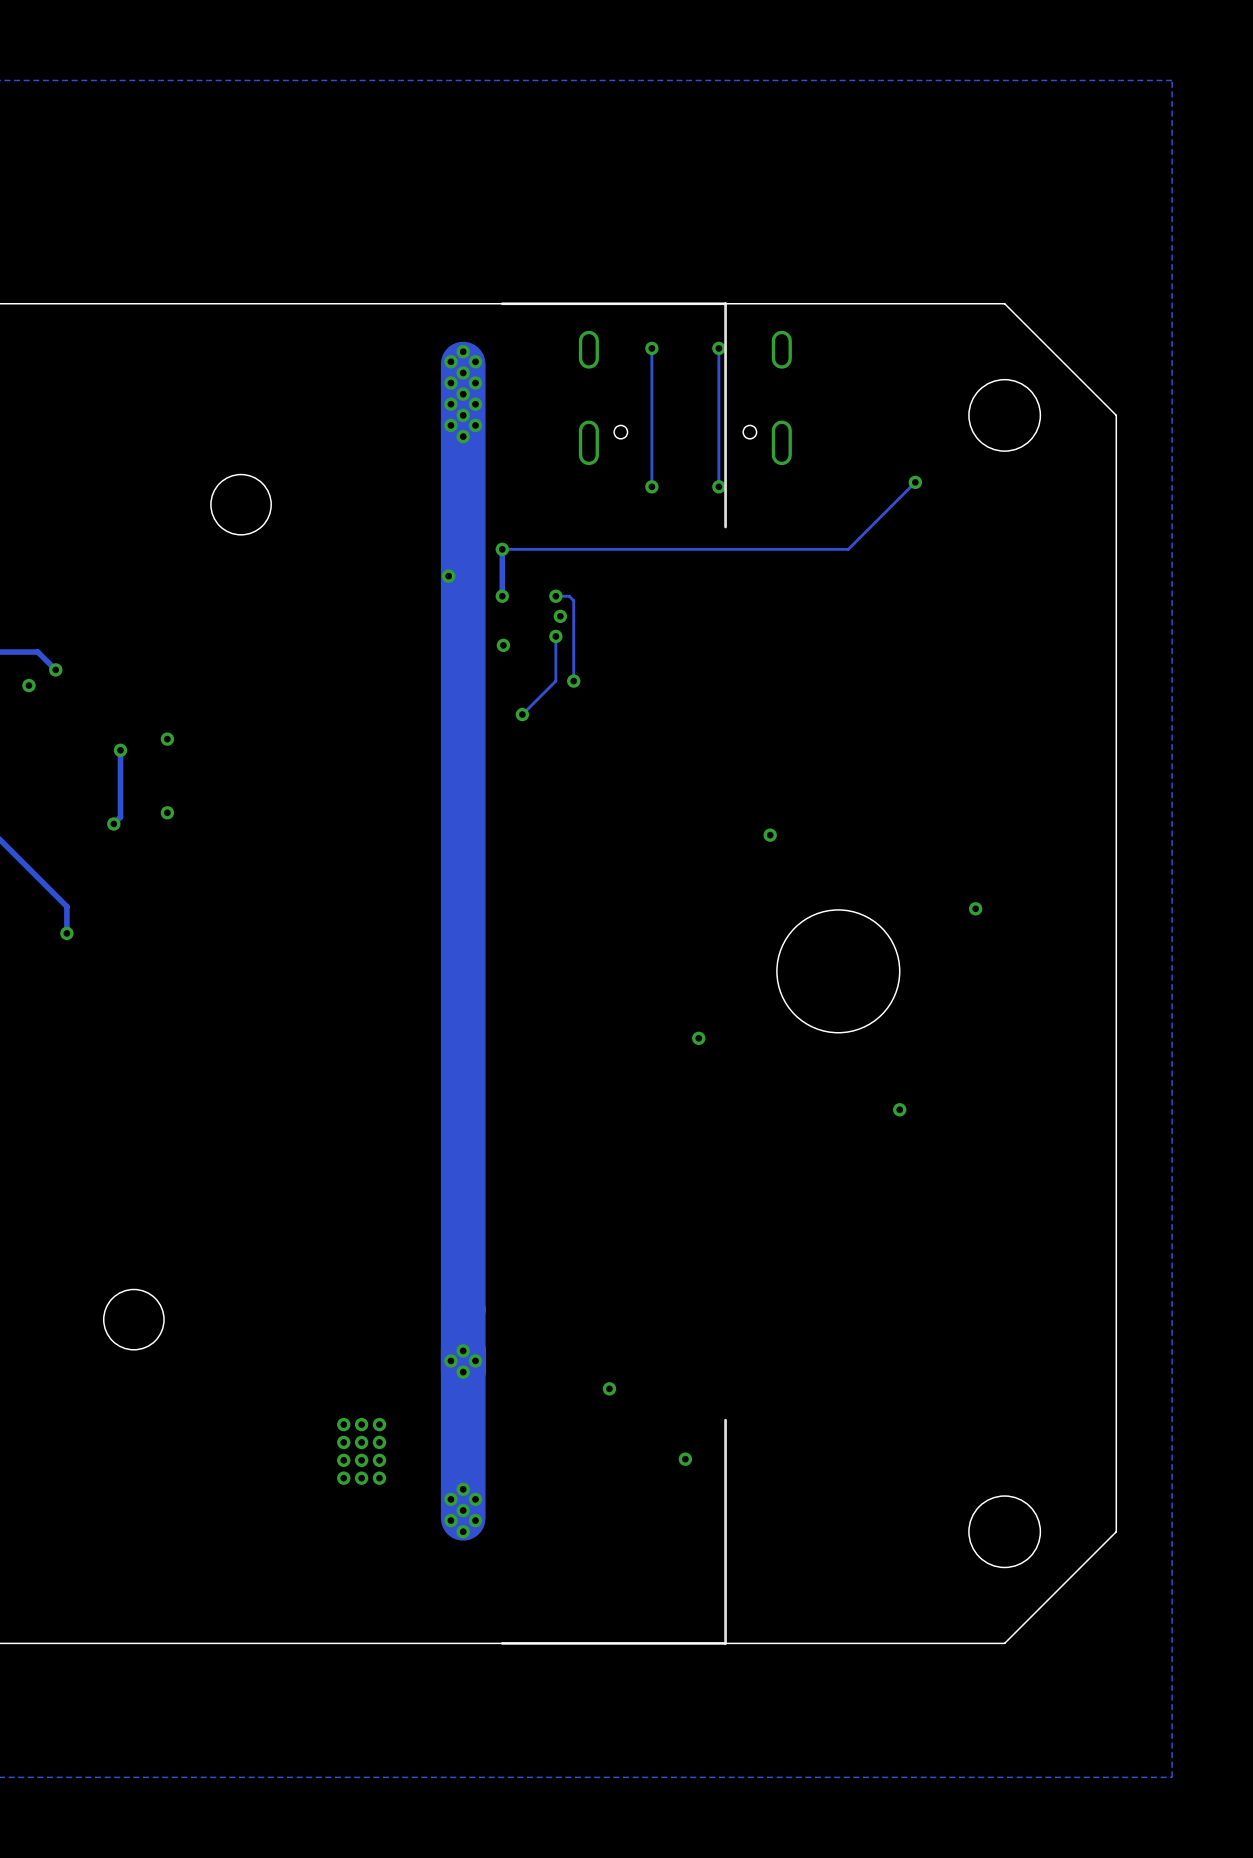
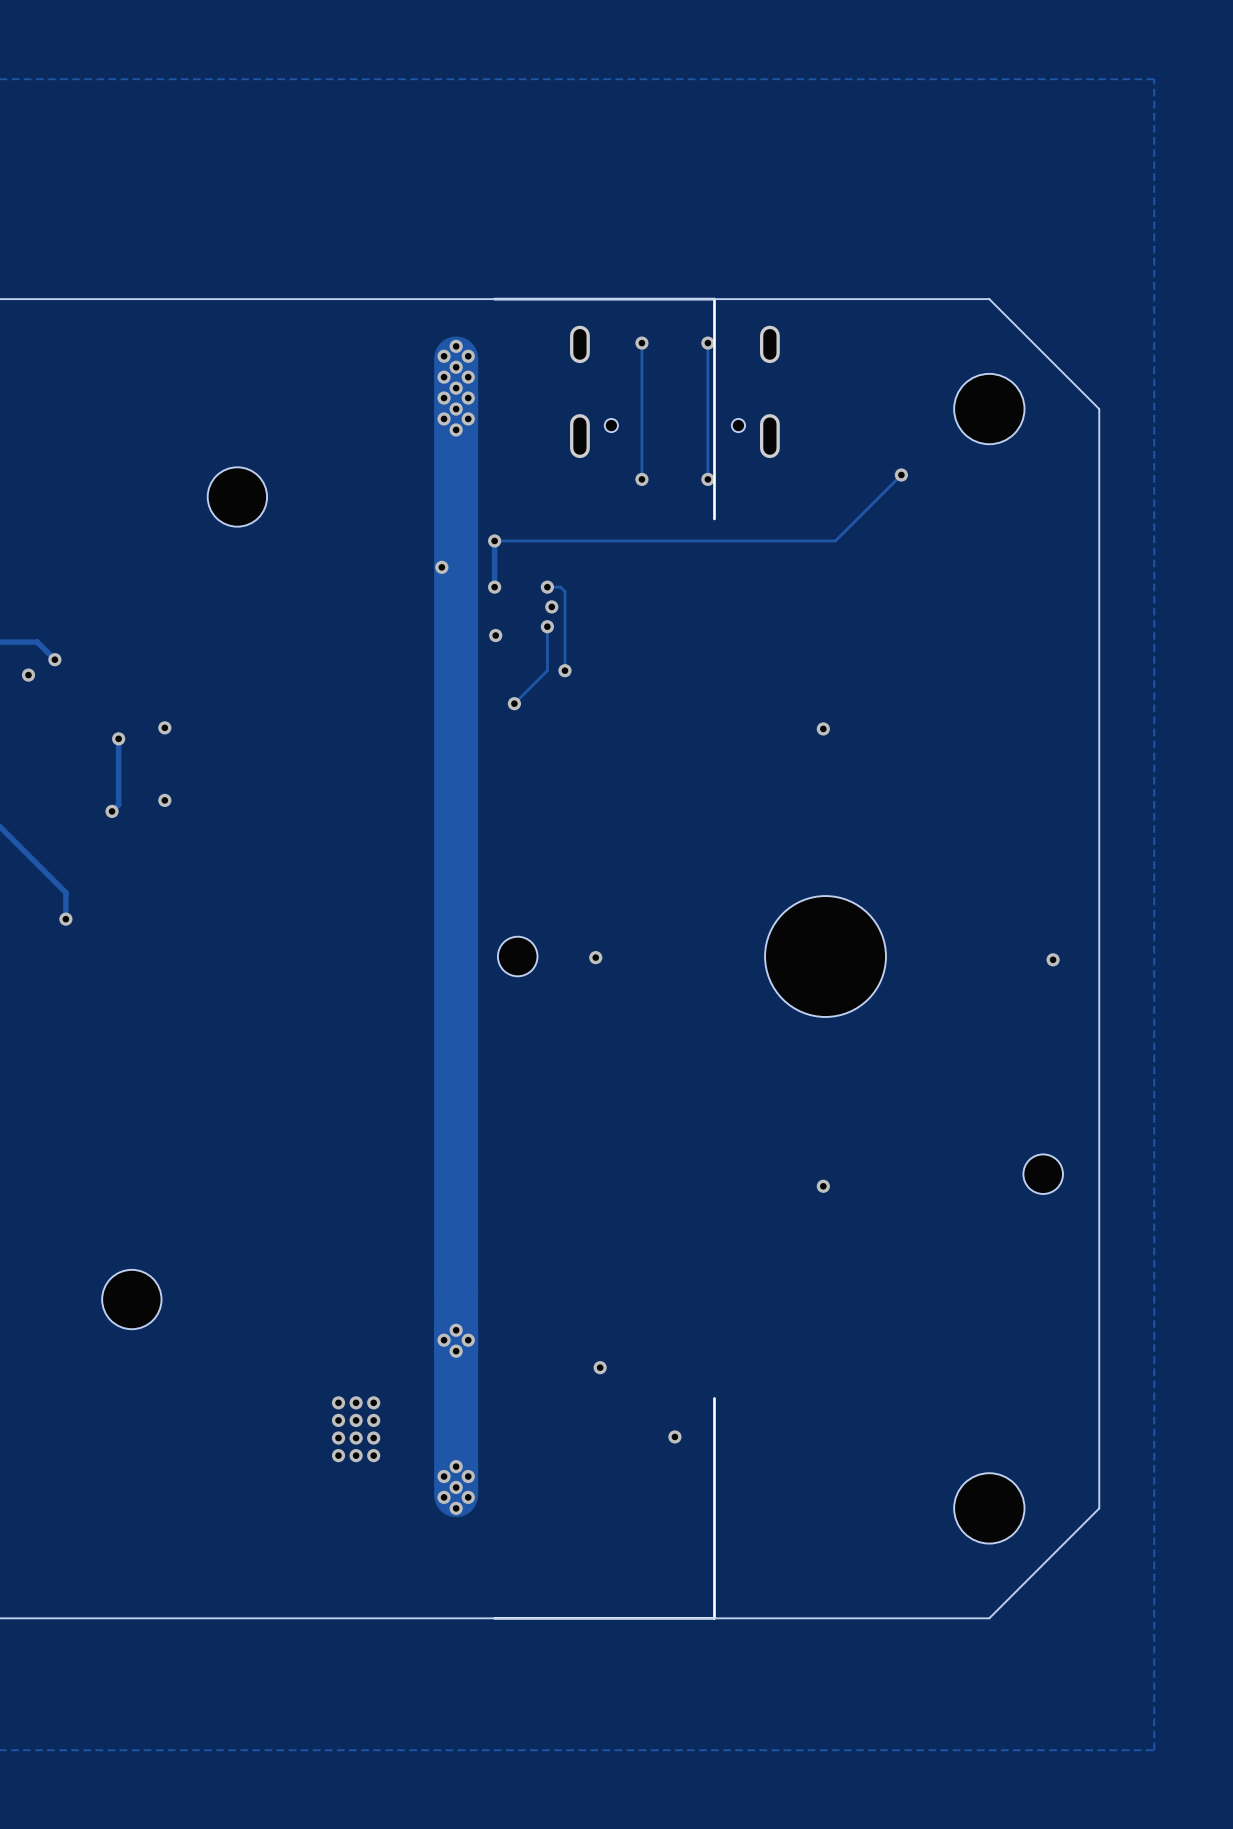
via: none -> (823, 728)
via: (770, 835) -> none
via: (975, 908) -> none
part: none -> (517, 956)
via: none -> (595, 957)
via: none -> (1053, 959)
via: (698, 1038) -> none
via: (899, 1109) -> none
part: none -> (1043, 1174)
via: none -> (823, 1186)

